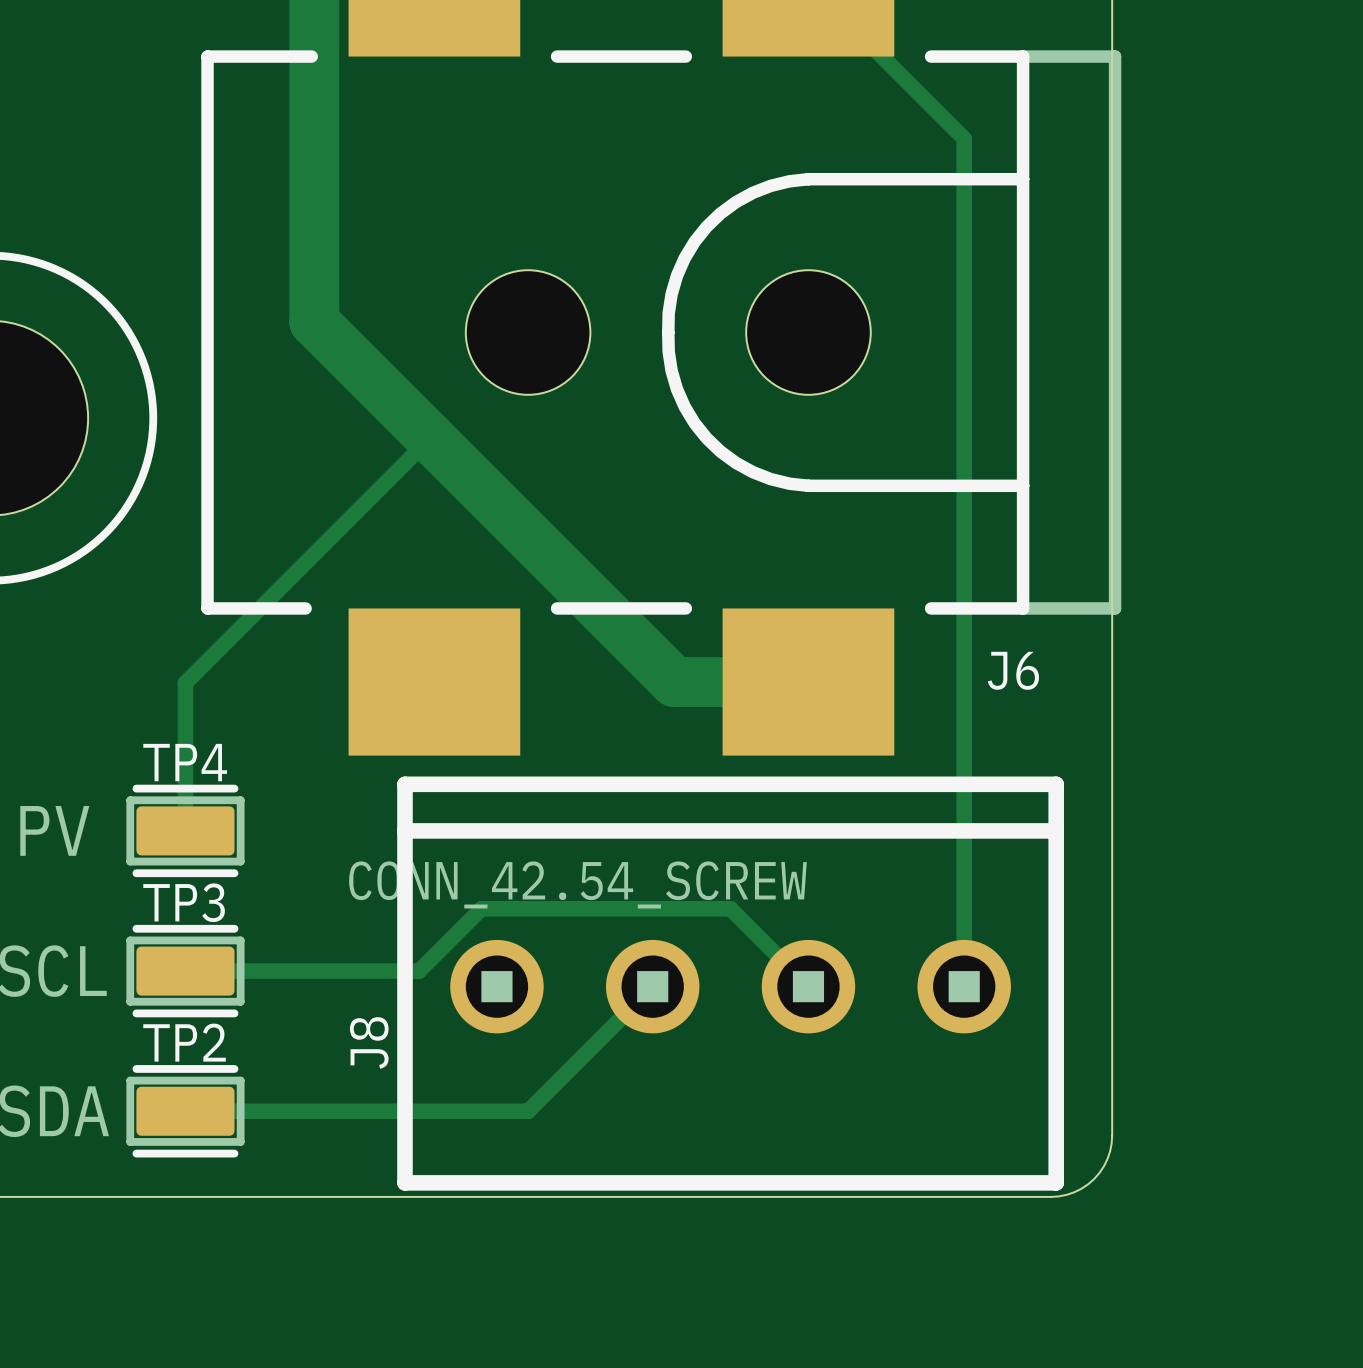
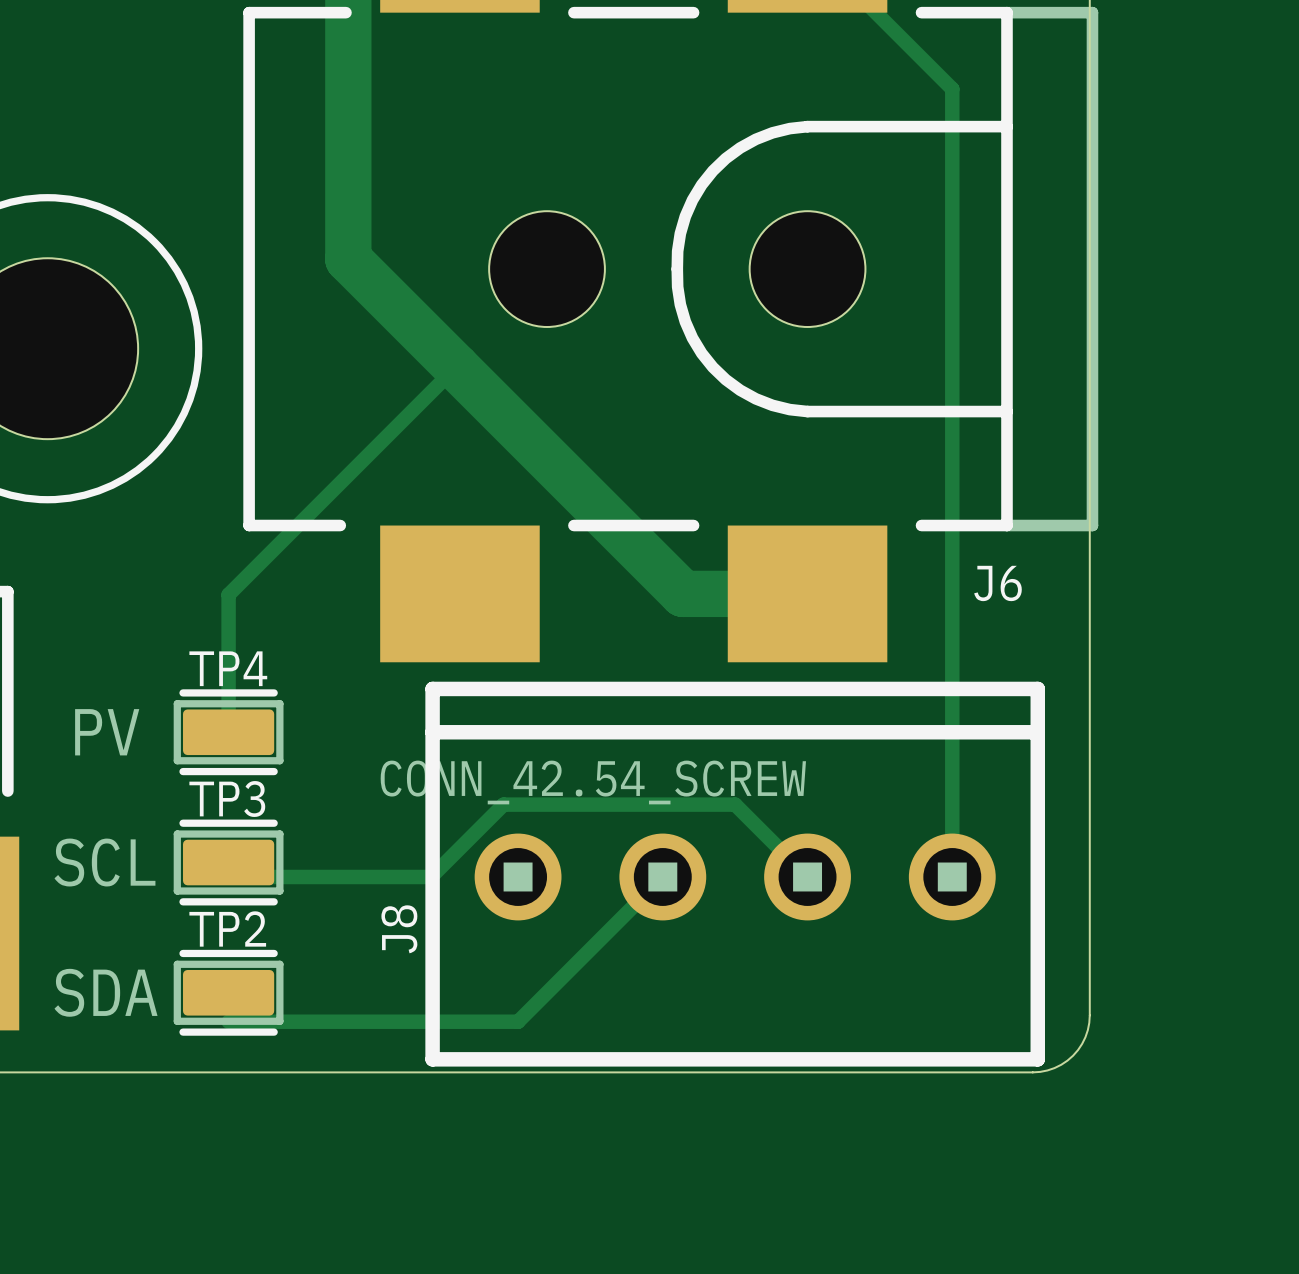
track: (185, 971) (419, 971) -> (228, 876) (431, 876) (445, 862)
track: (185, 1111) (528, 1111) -> (228, 1021) (518, 1021) (547, 992)

